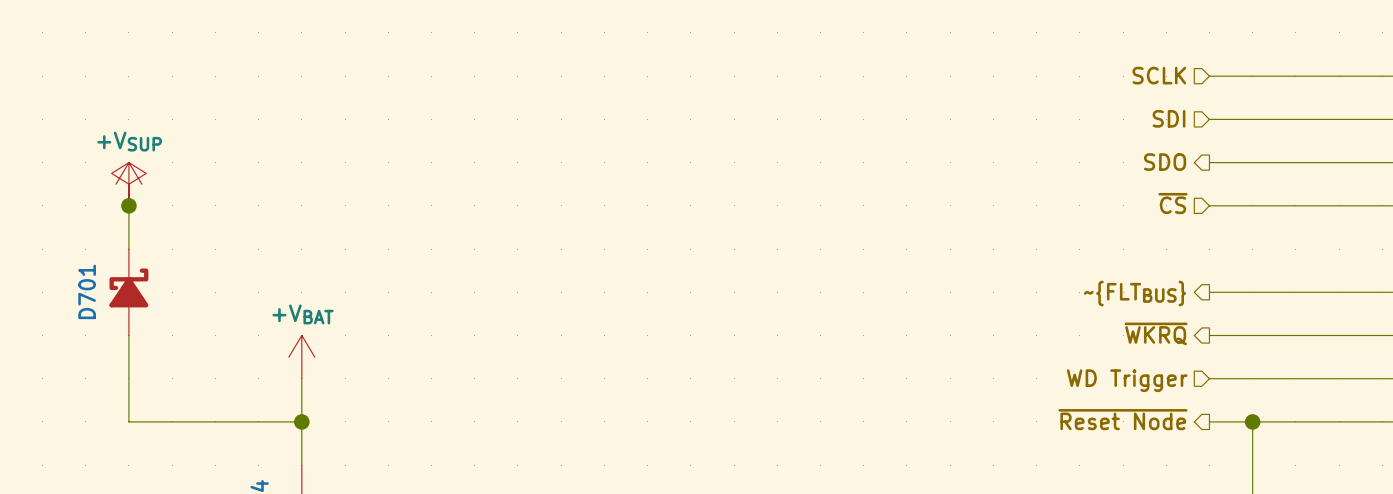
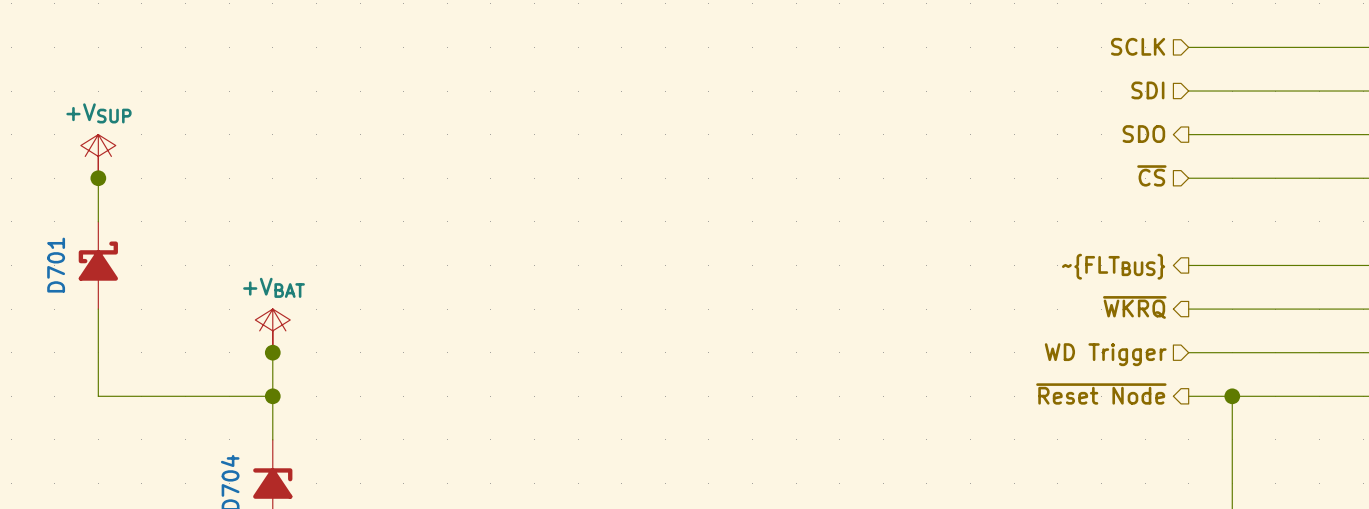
power symbol: none -> (272, 330)
junction: none -> (272, 352)

